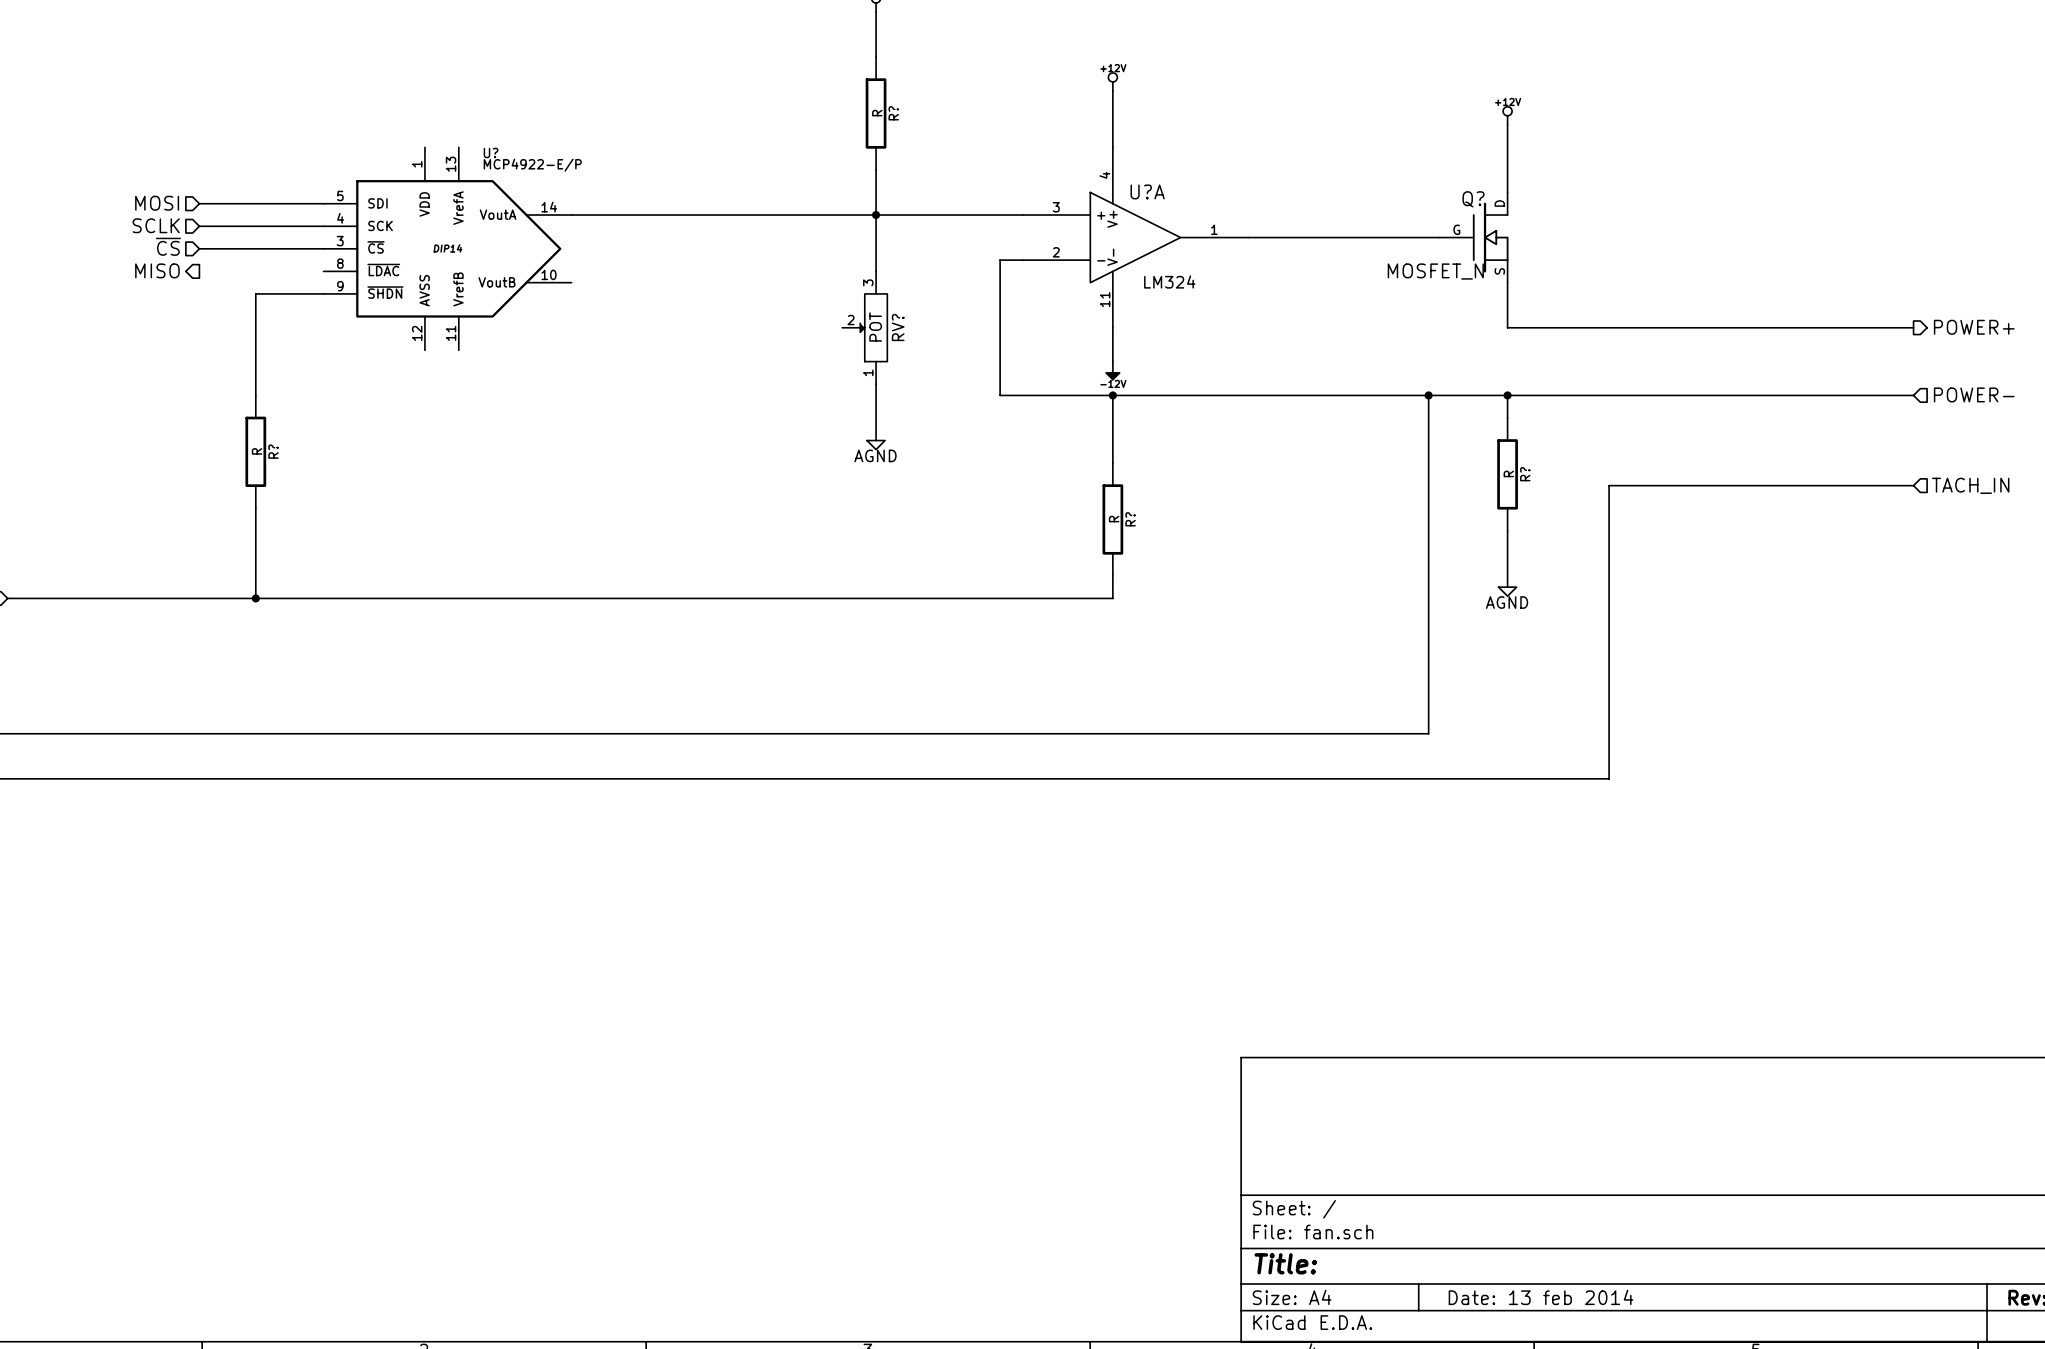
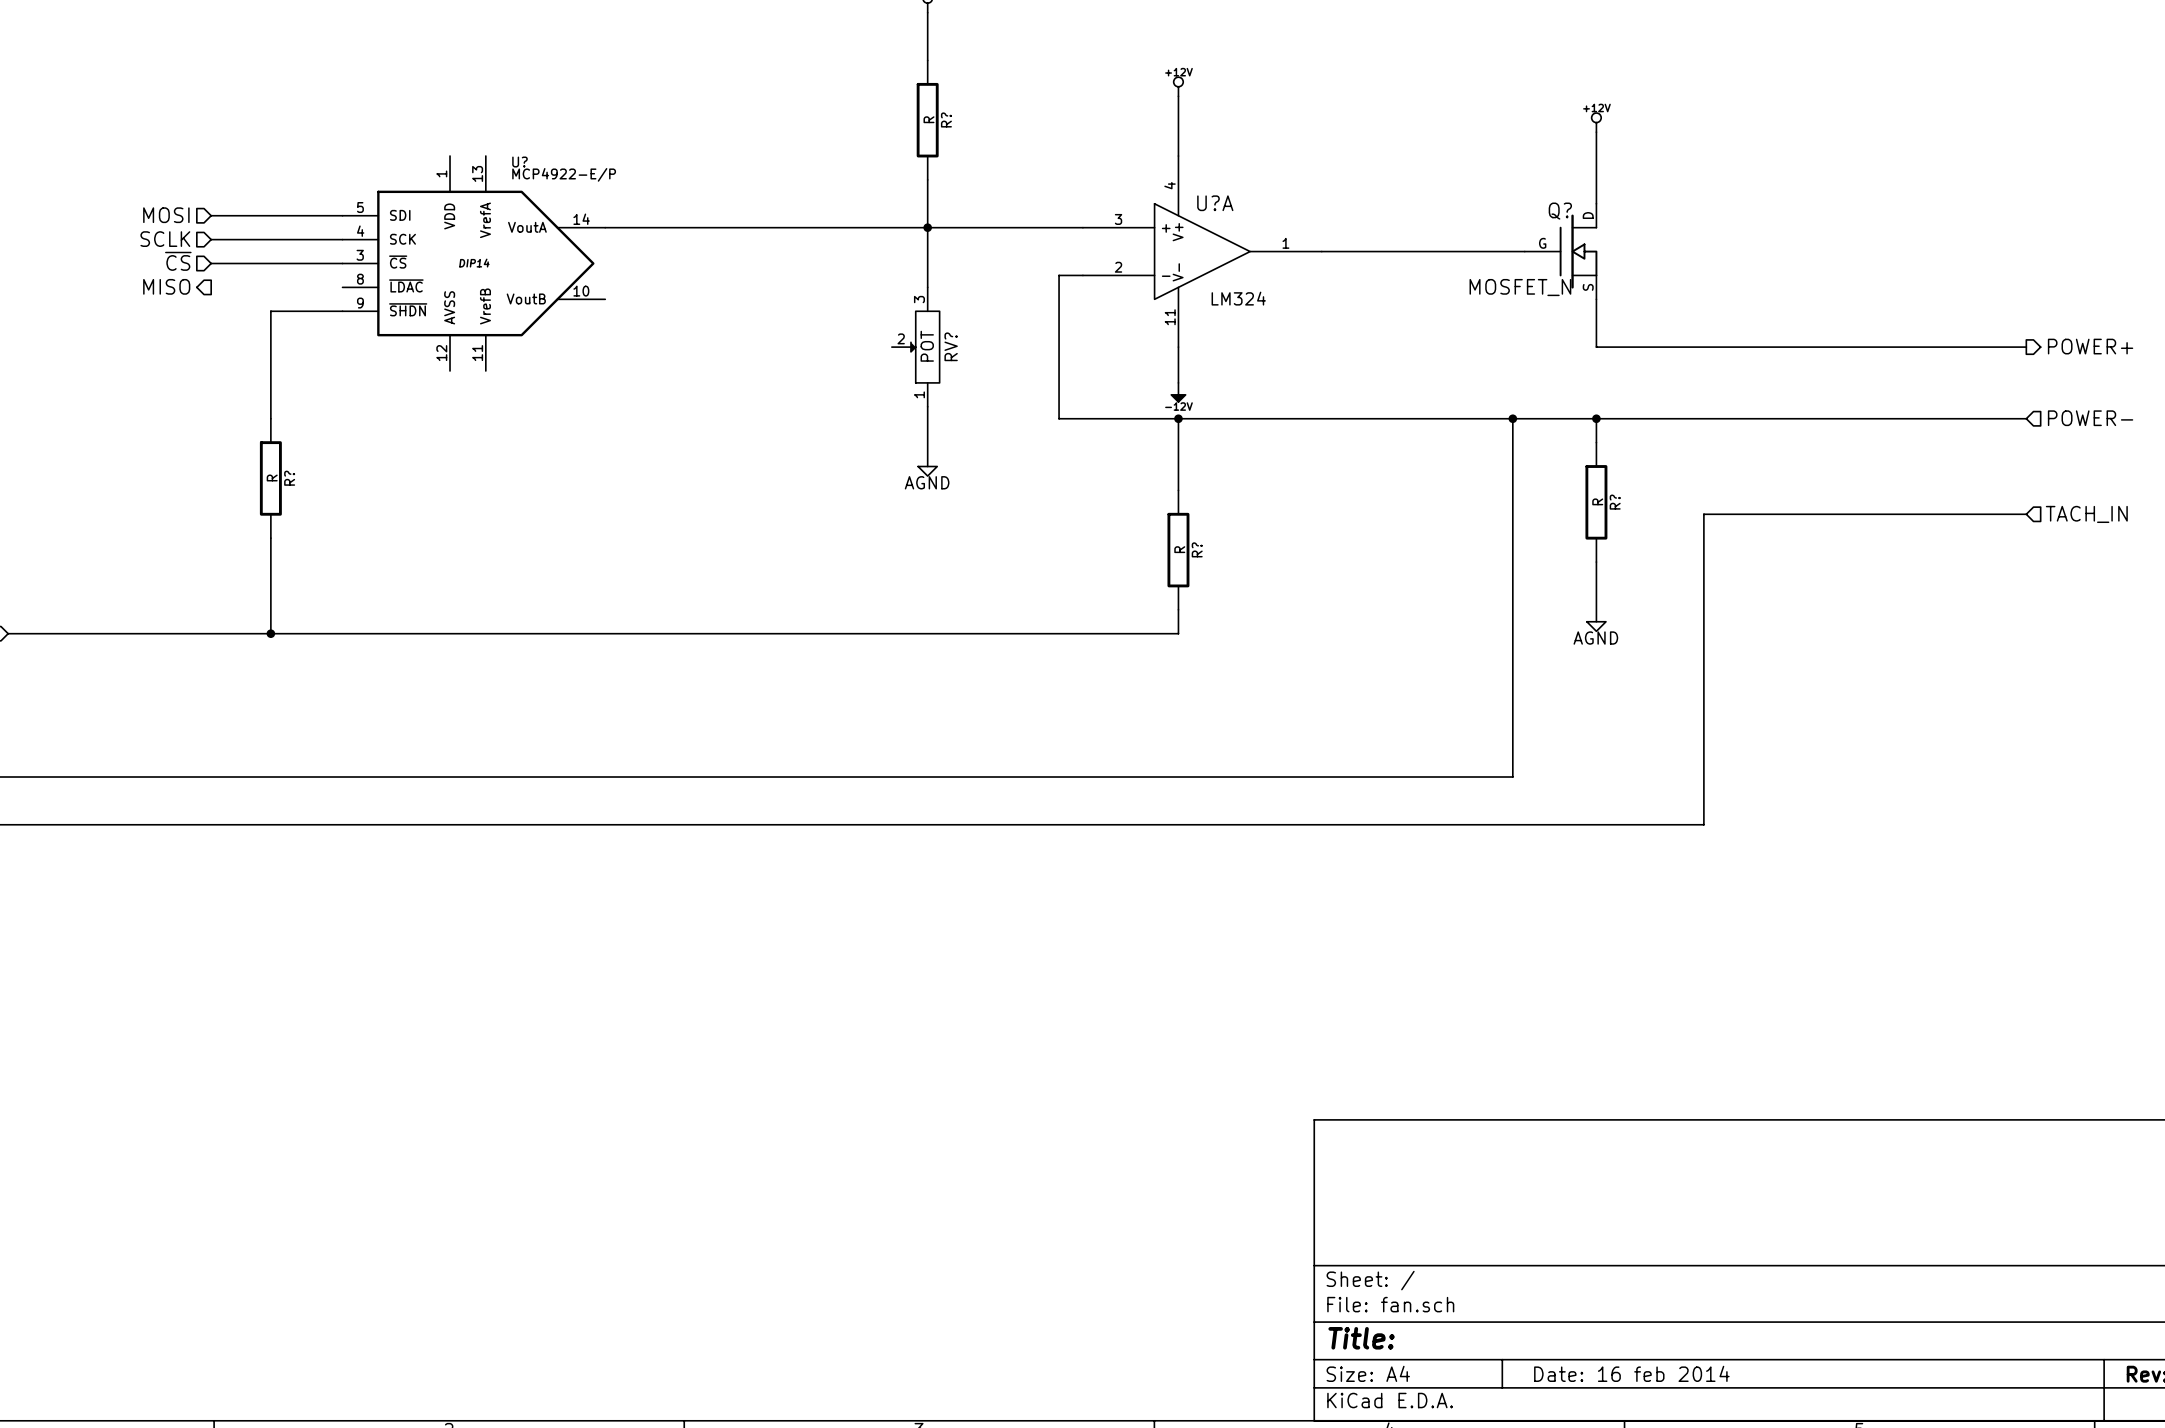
title block: Date: 13 feb 2014 (1541, 1297) -> Date: 16 feb 2014 (1631, 1373)

